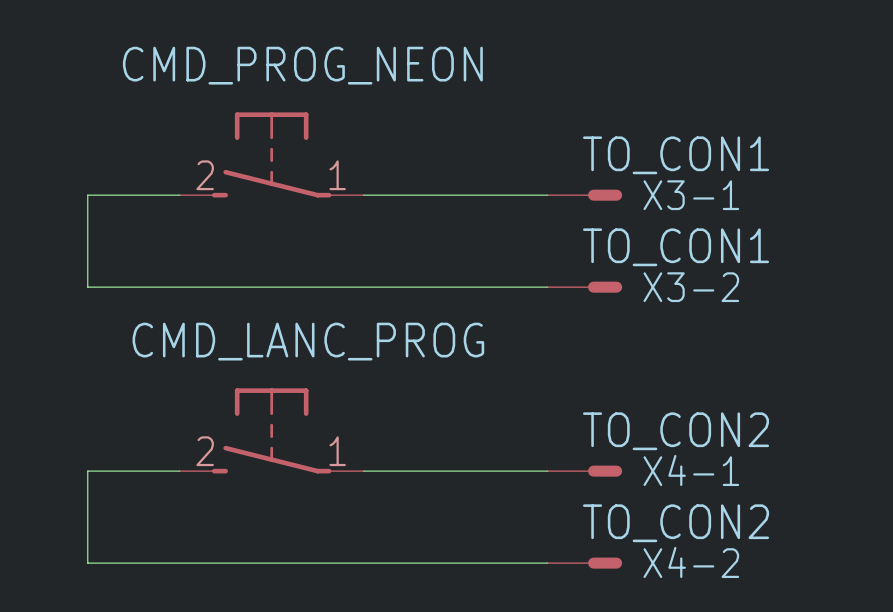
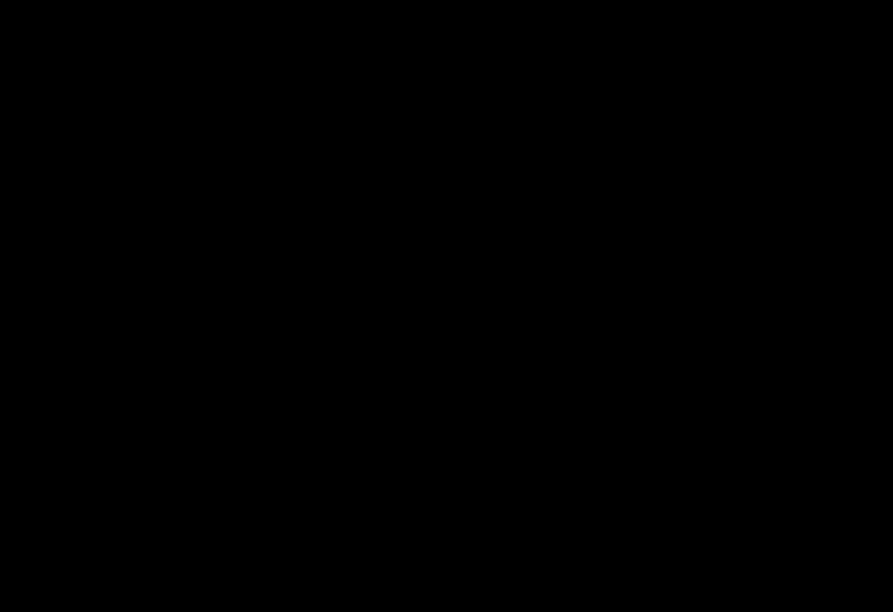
CMD_PROG_NEON: (271, 154) -> none
wire: (179, 195) (87, 195) (87, 287) (547, 287) -> none
wire: (363, 195) (547, 195) -> none
X3-1: TO_CON1 (584, 195) -> none
X3-2: TO_CON1 (584, 287) -> none
CMD_LANC_PROG: (271, 430) -> none
wire: (179, 471) (87, 471) (87, 563) (547, 563) -> none
wire: (363, 471) (547, 471) -> none
X4-1: TO_CON2 (584, 471) -> none
X4-2: TO_CON2 (584, 563) -> none

